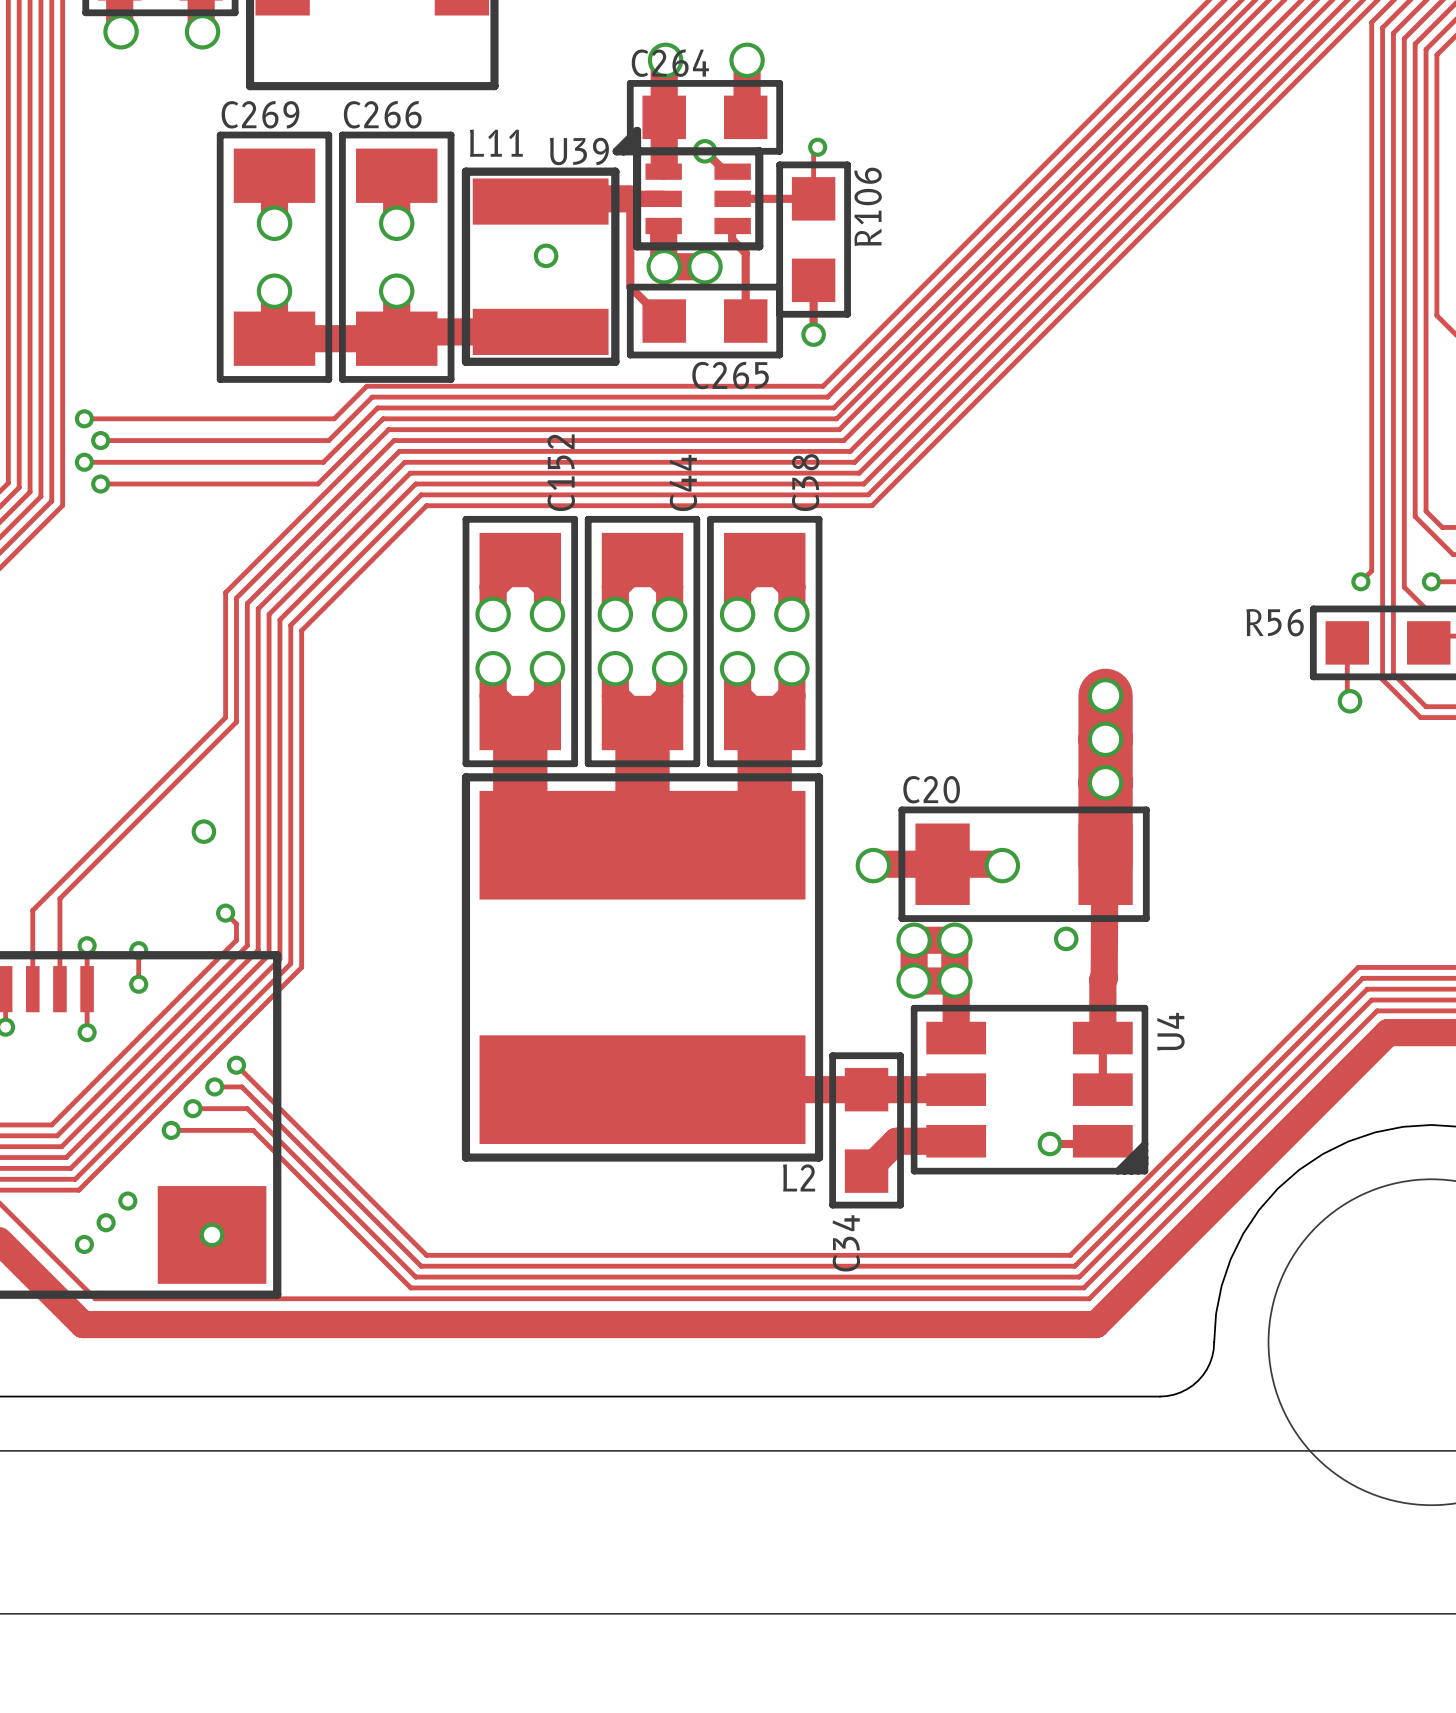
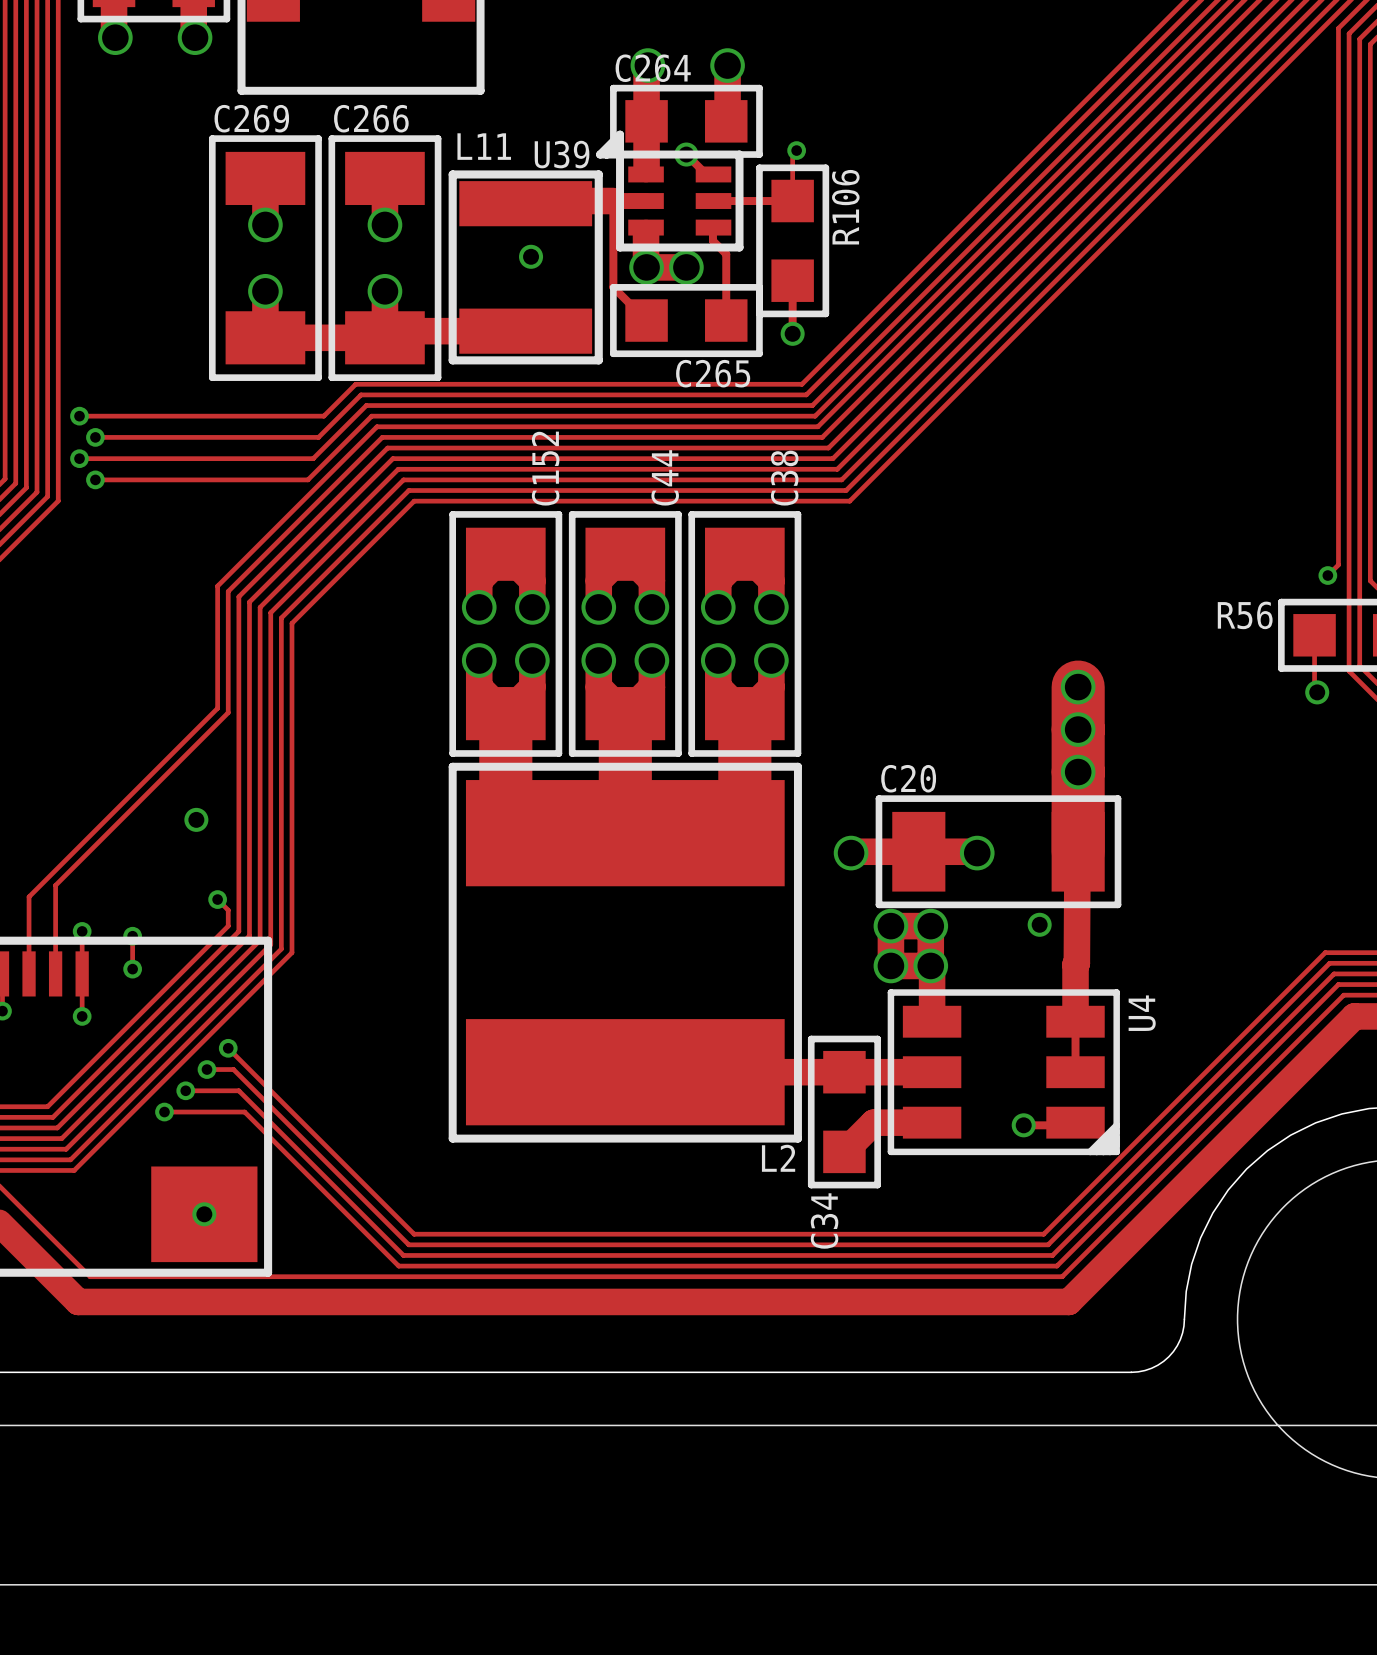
via: (127, 1201) -> none
via: (106, 1222) -> none
via: (84, 1244) -> none

